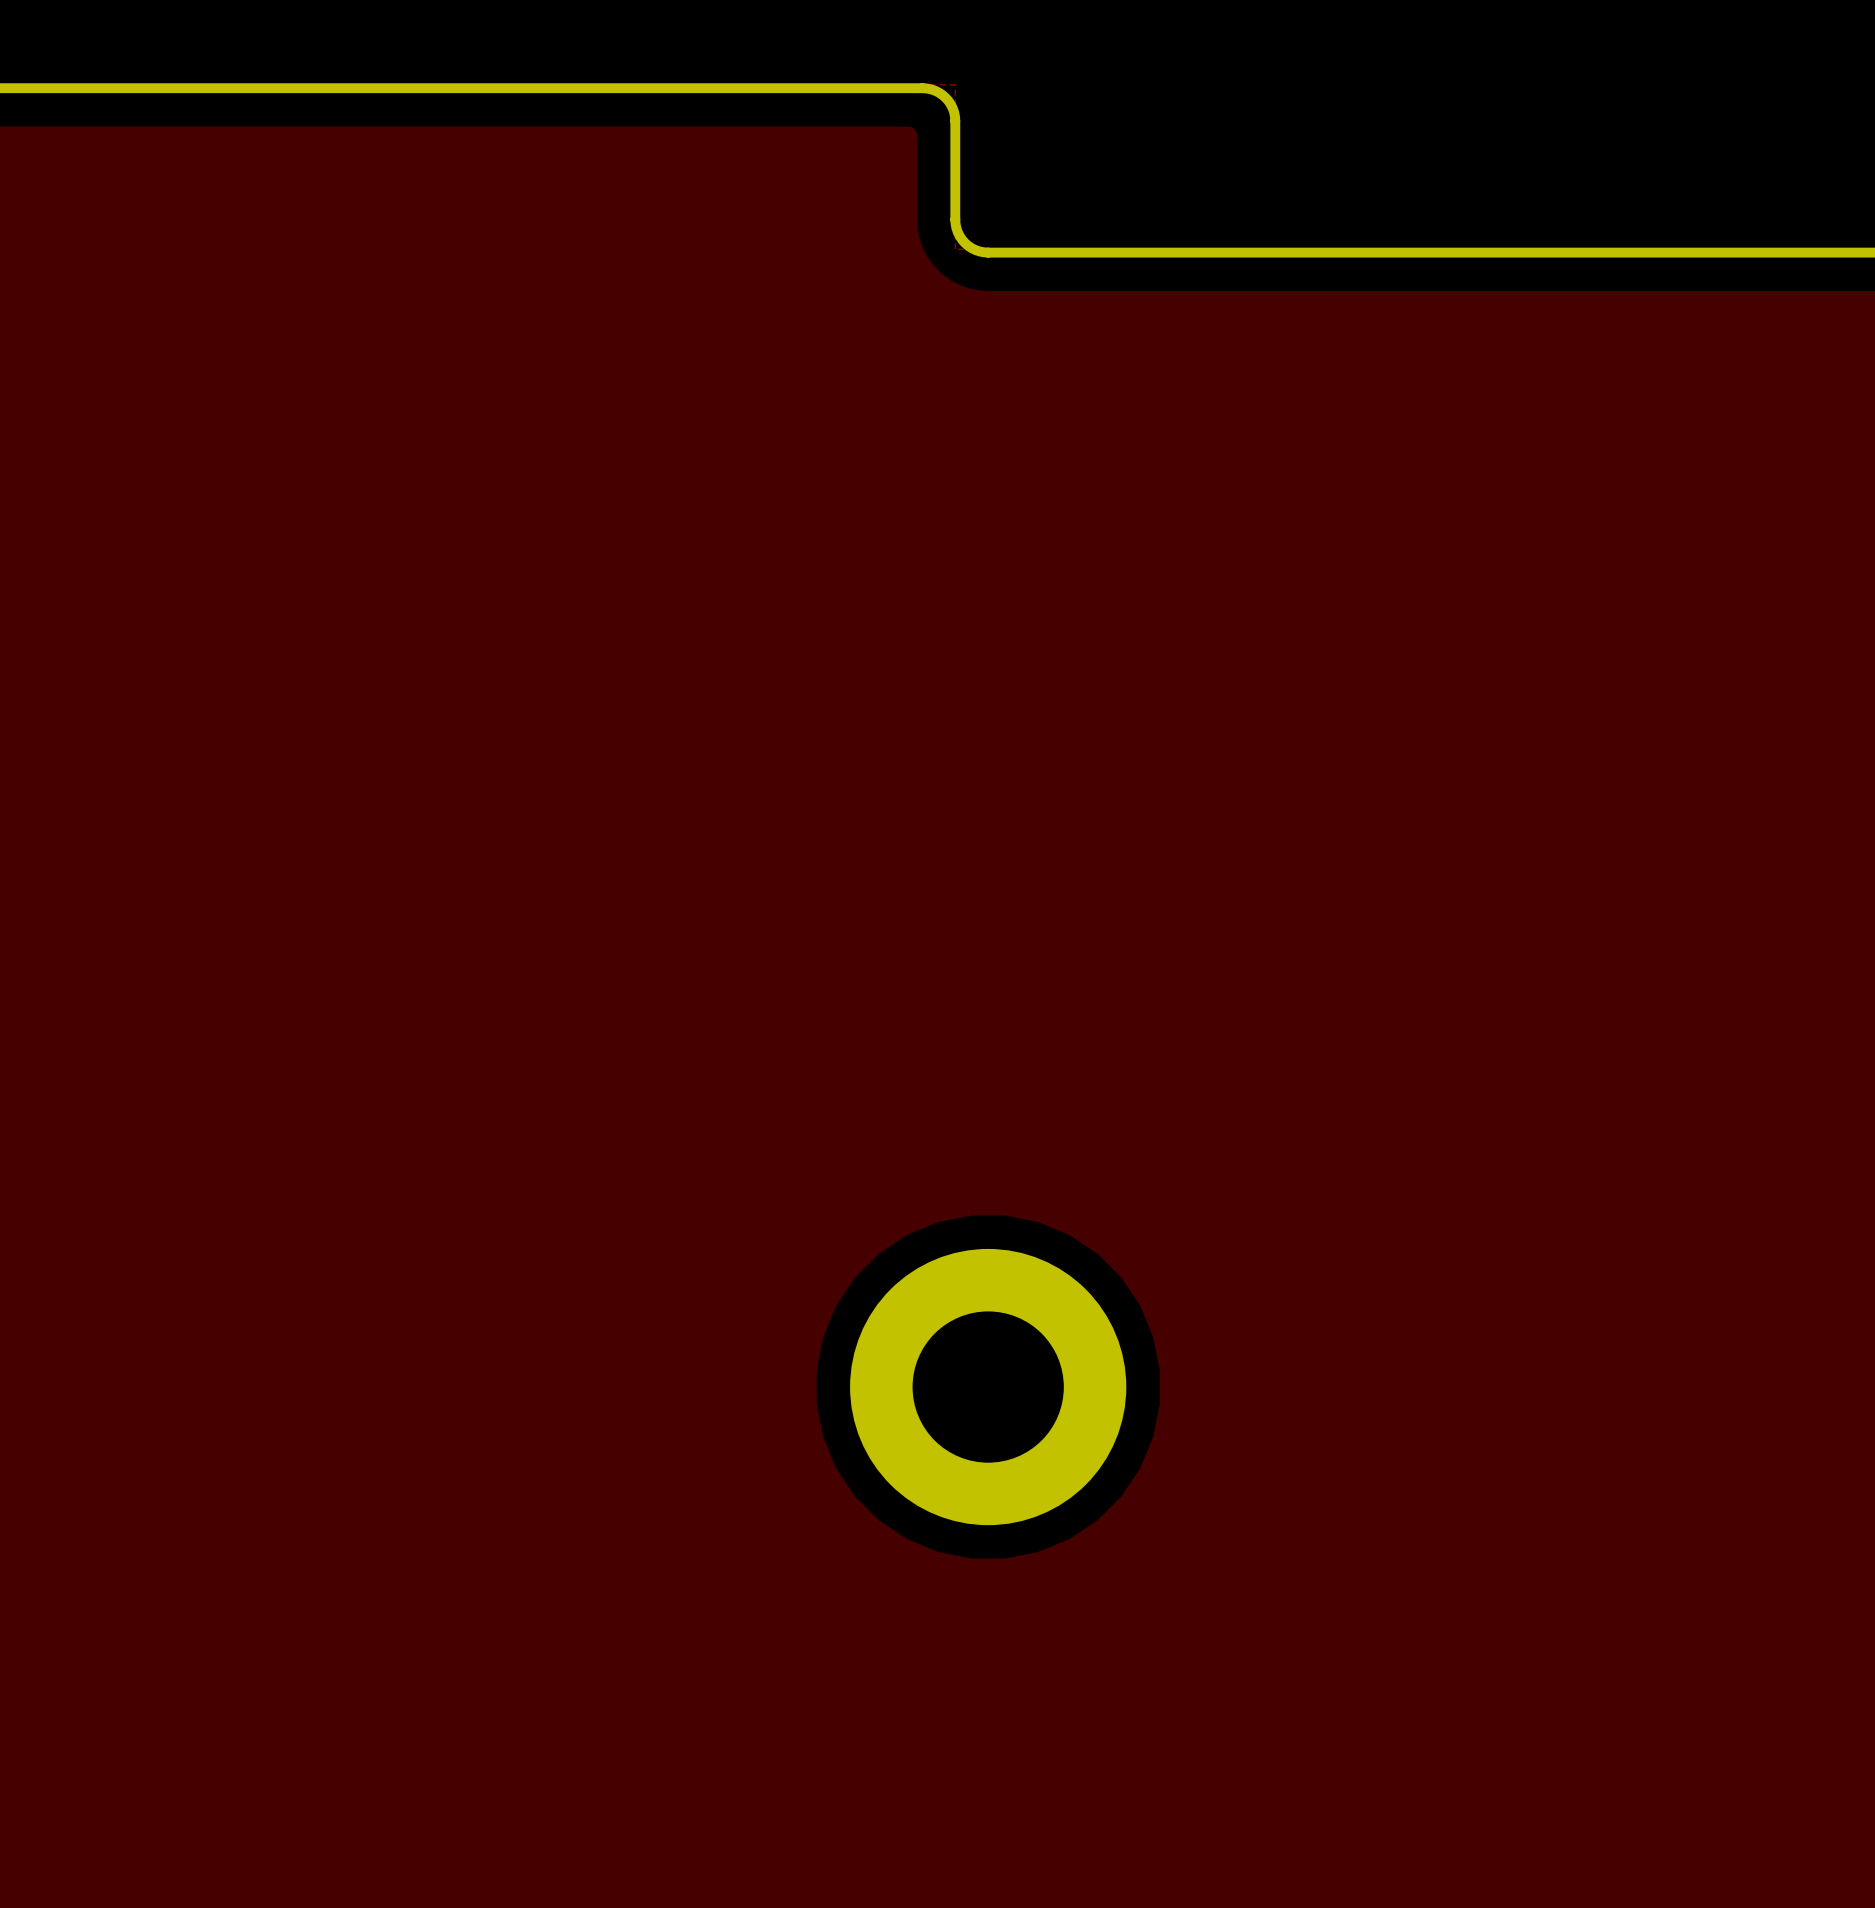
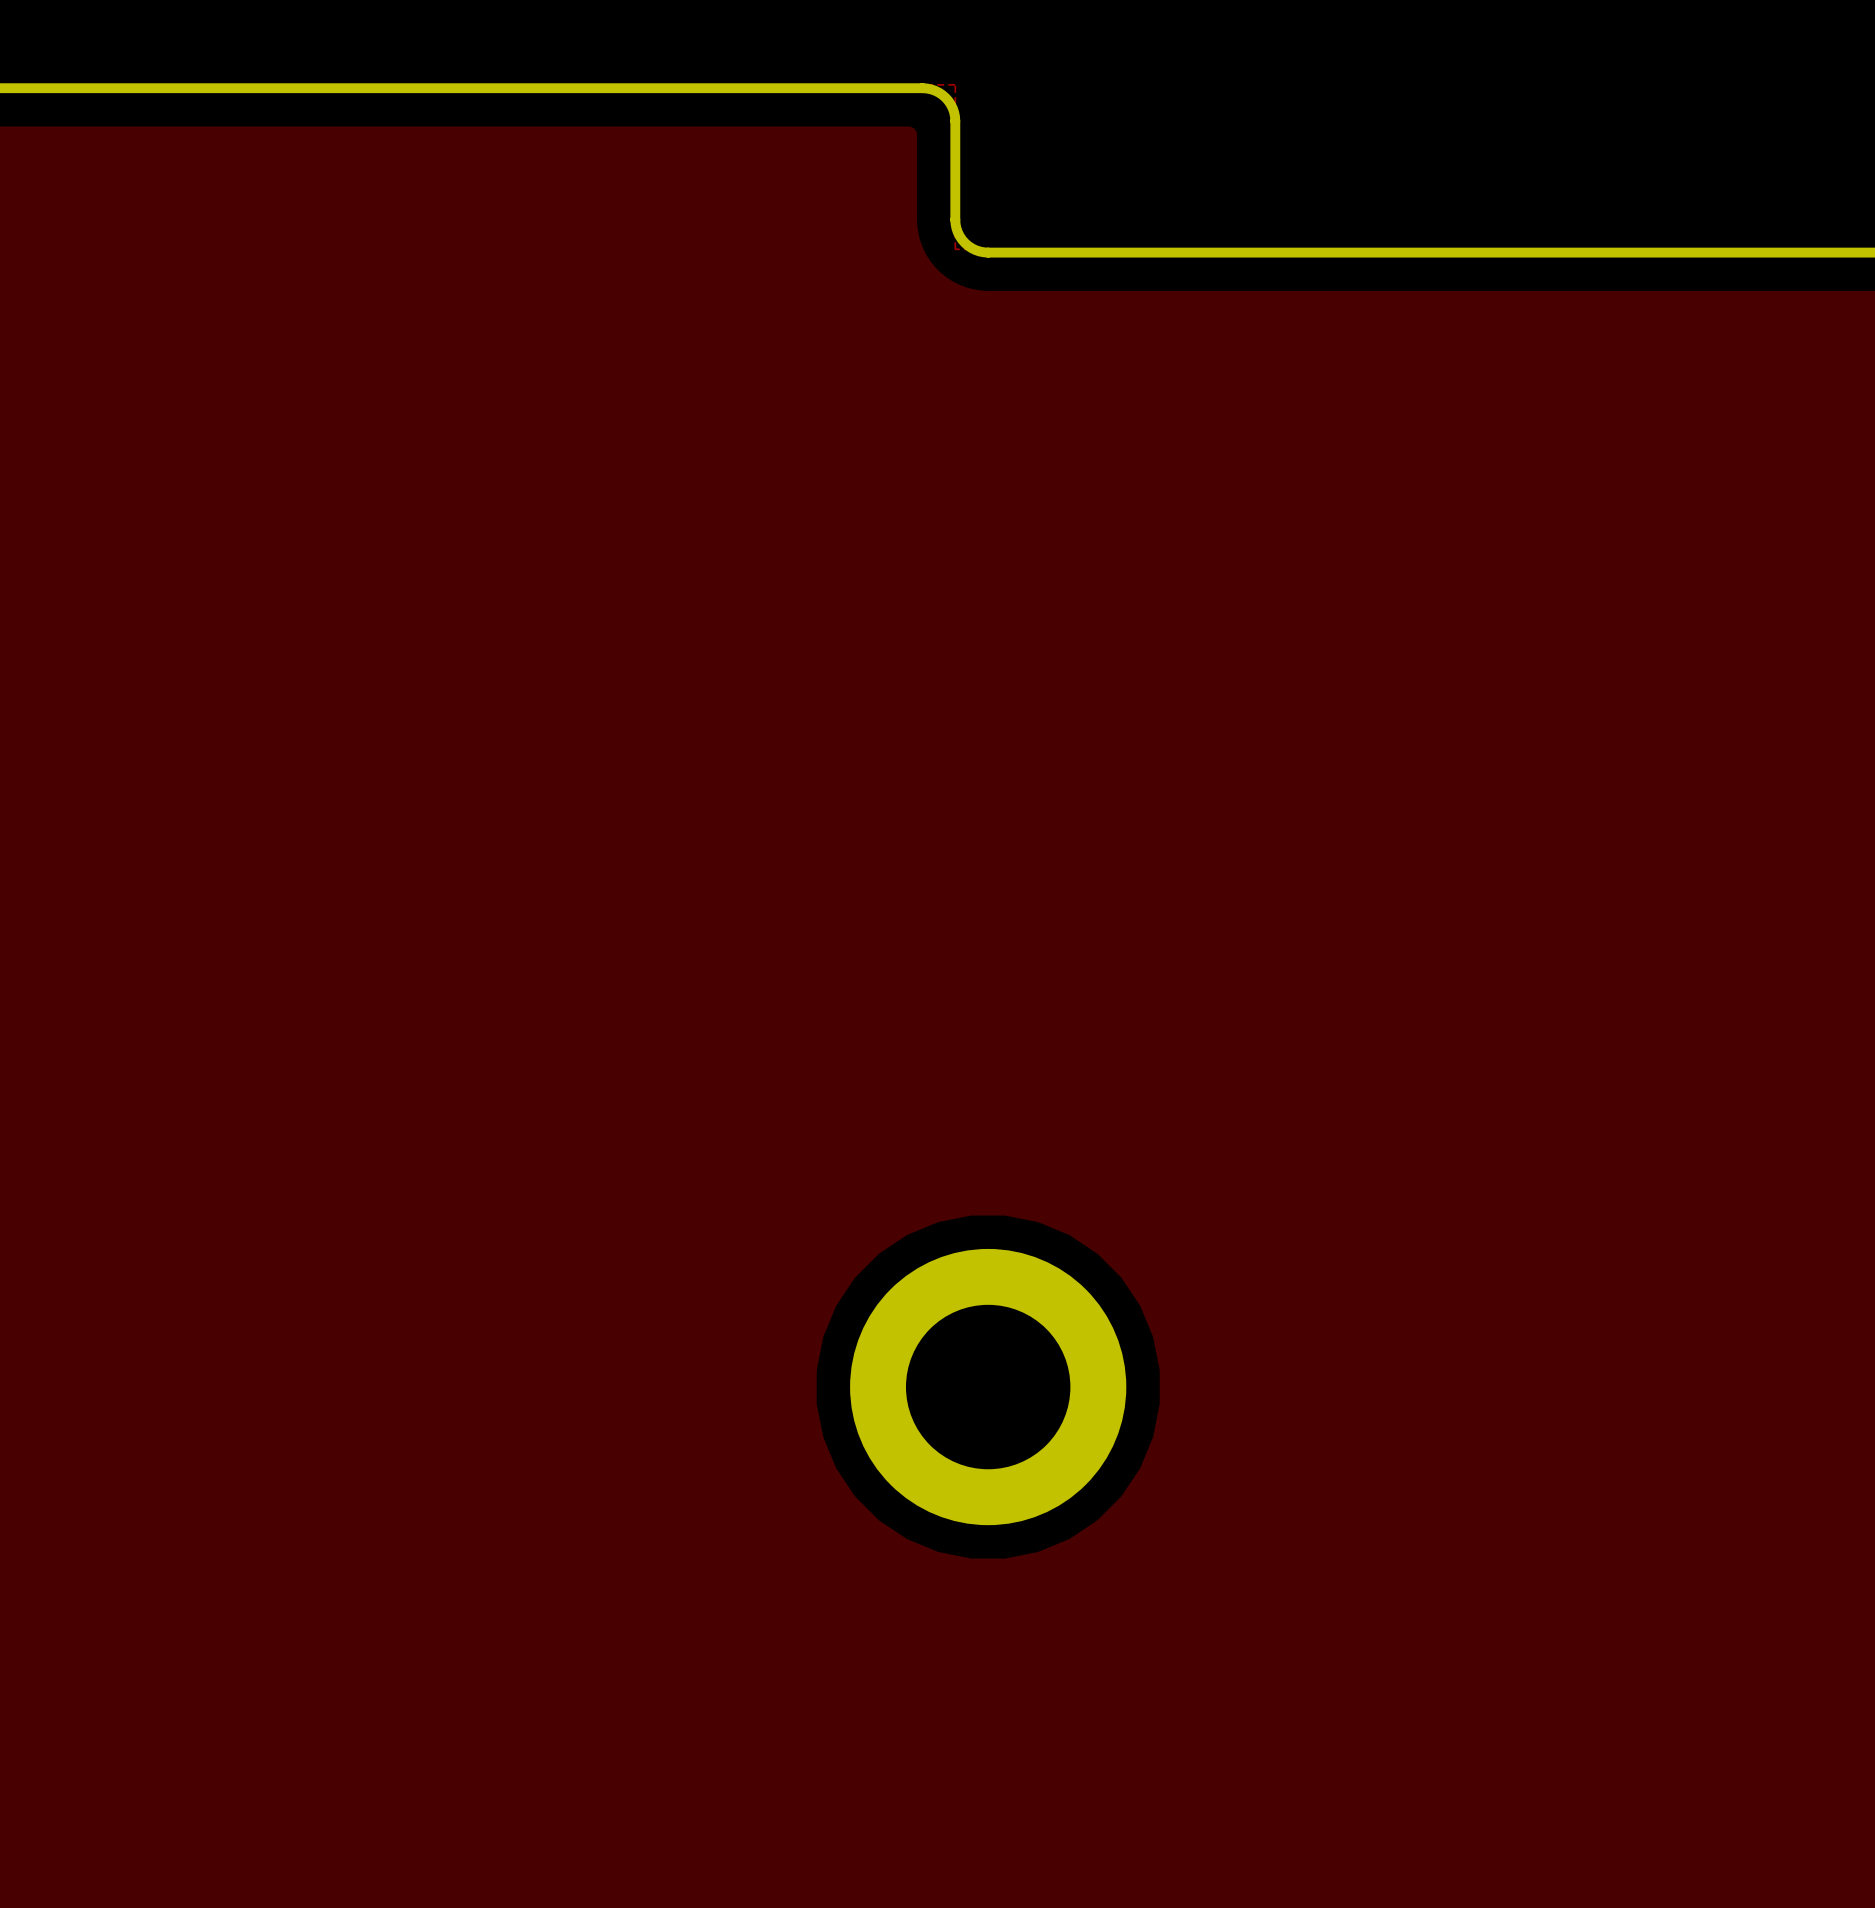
part footprint: [850, 1248, 1127, 1526] -> [850, 1248, 1127, 1526]

